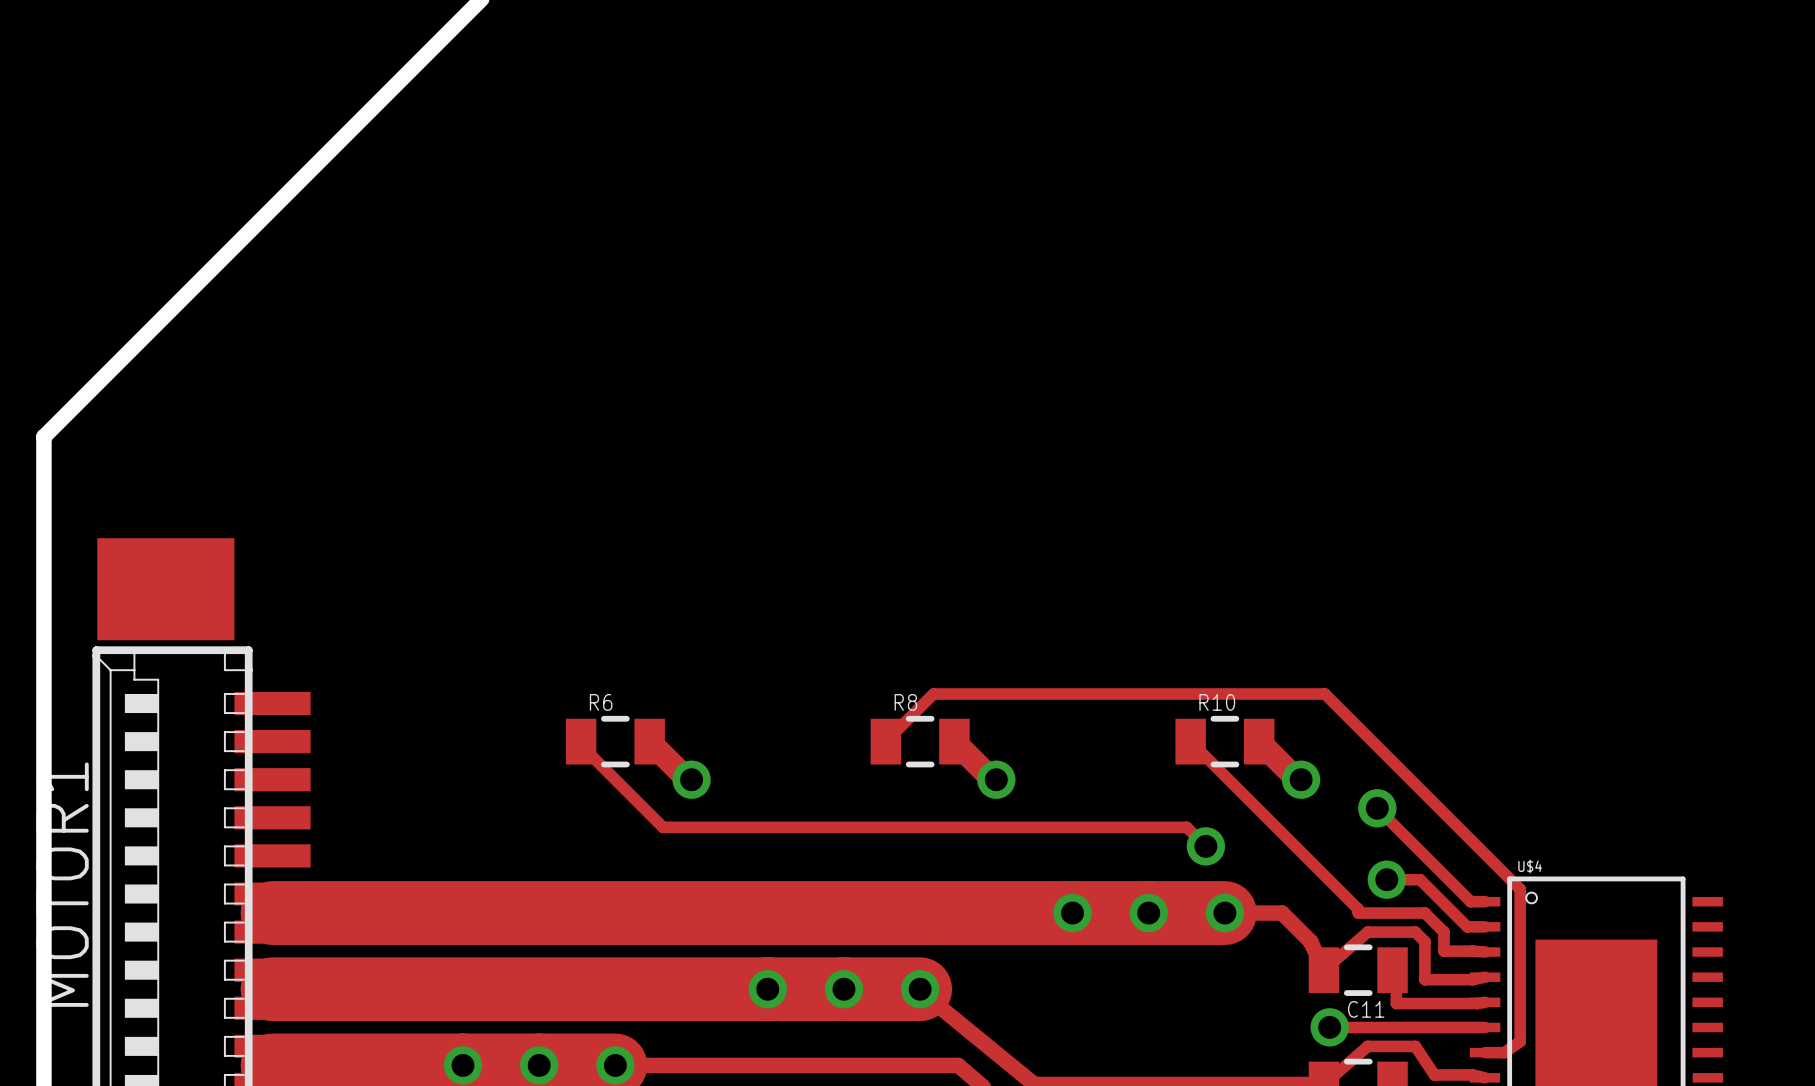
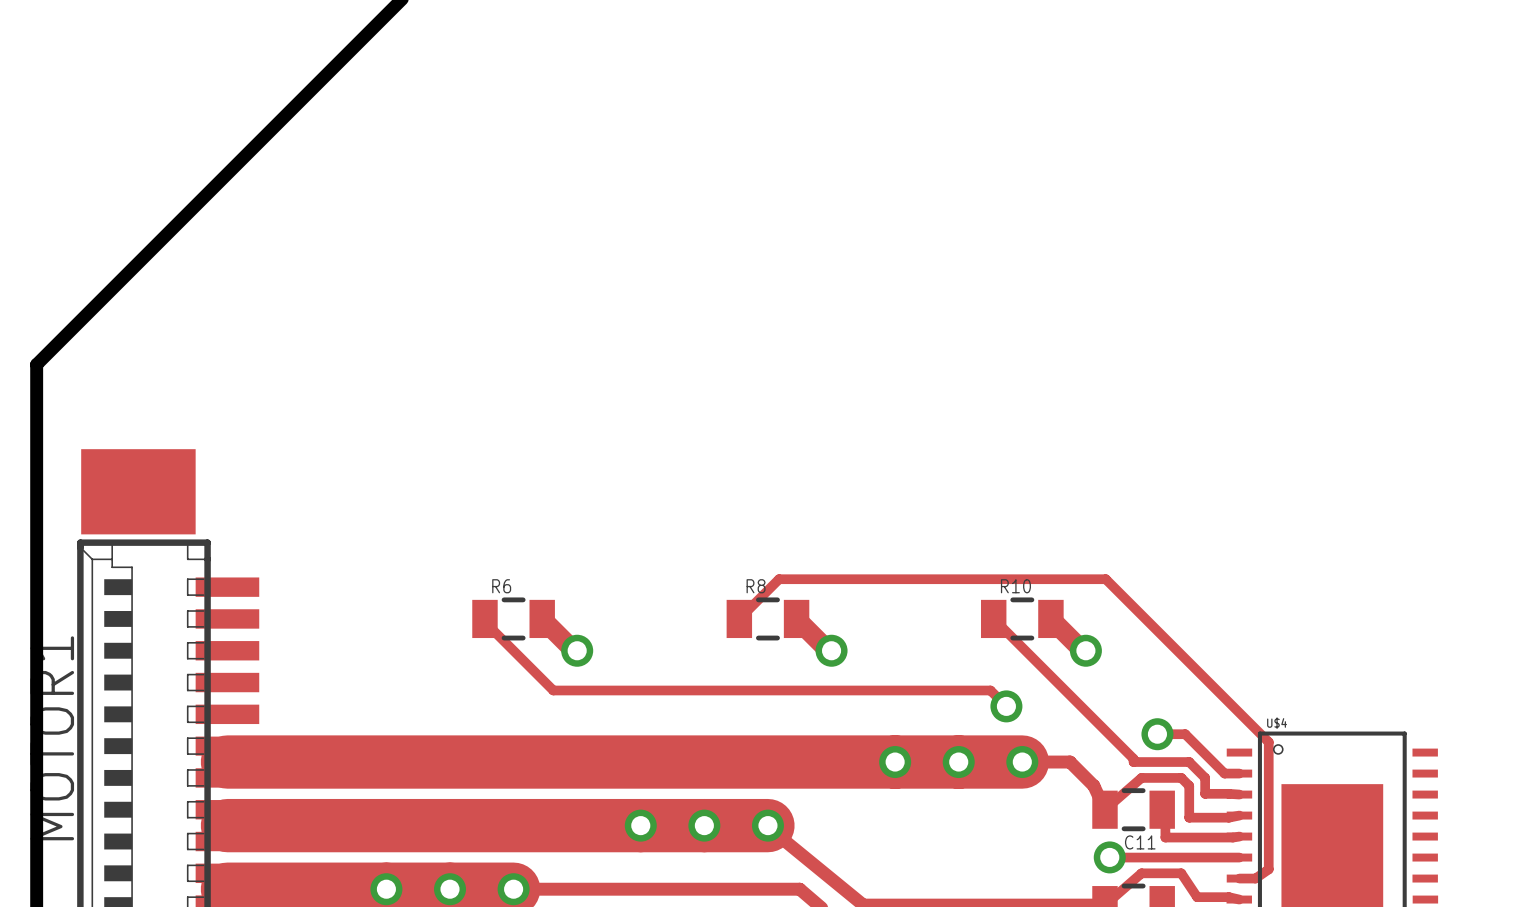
track: (1377, 808) (1470, 901) (1485, 901) -> none
via: (1377, 808) -> none

